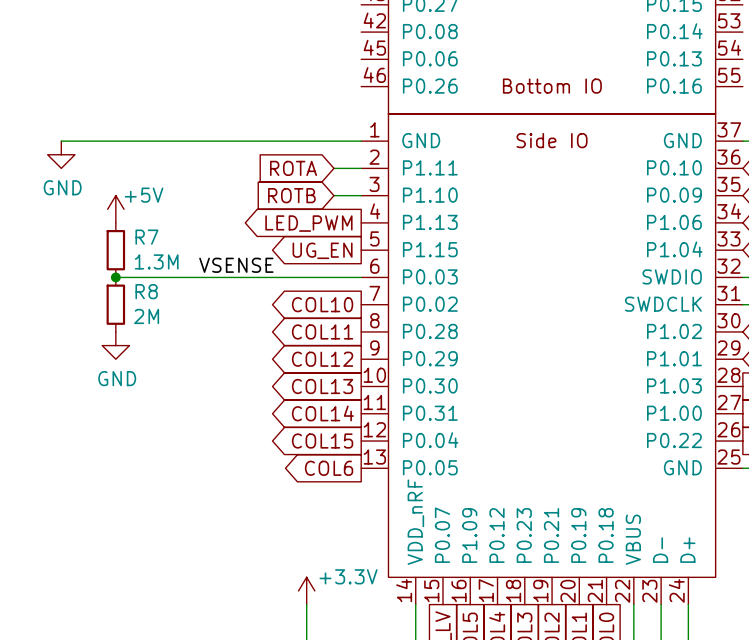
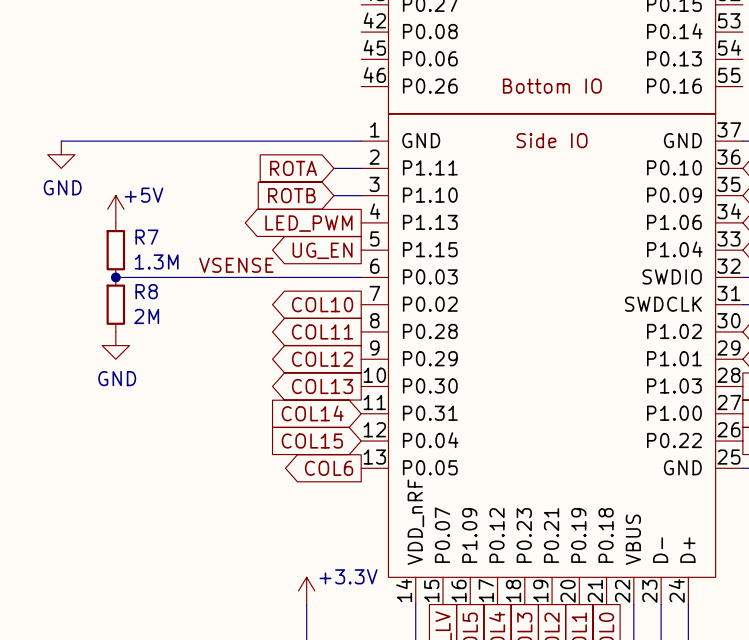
global label shape: output (322, 413) -> input (312, 413)
global label shape: output (322, 441) -> input (312, 441)

